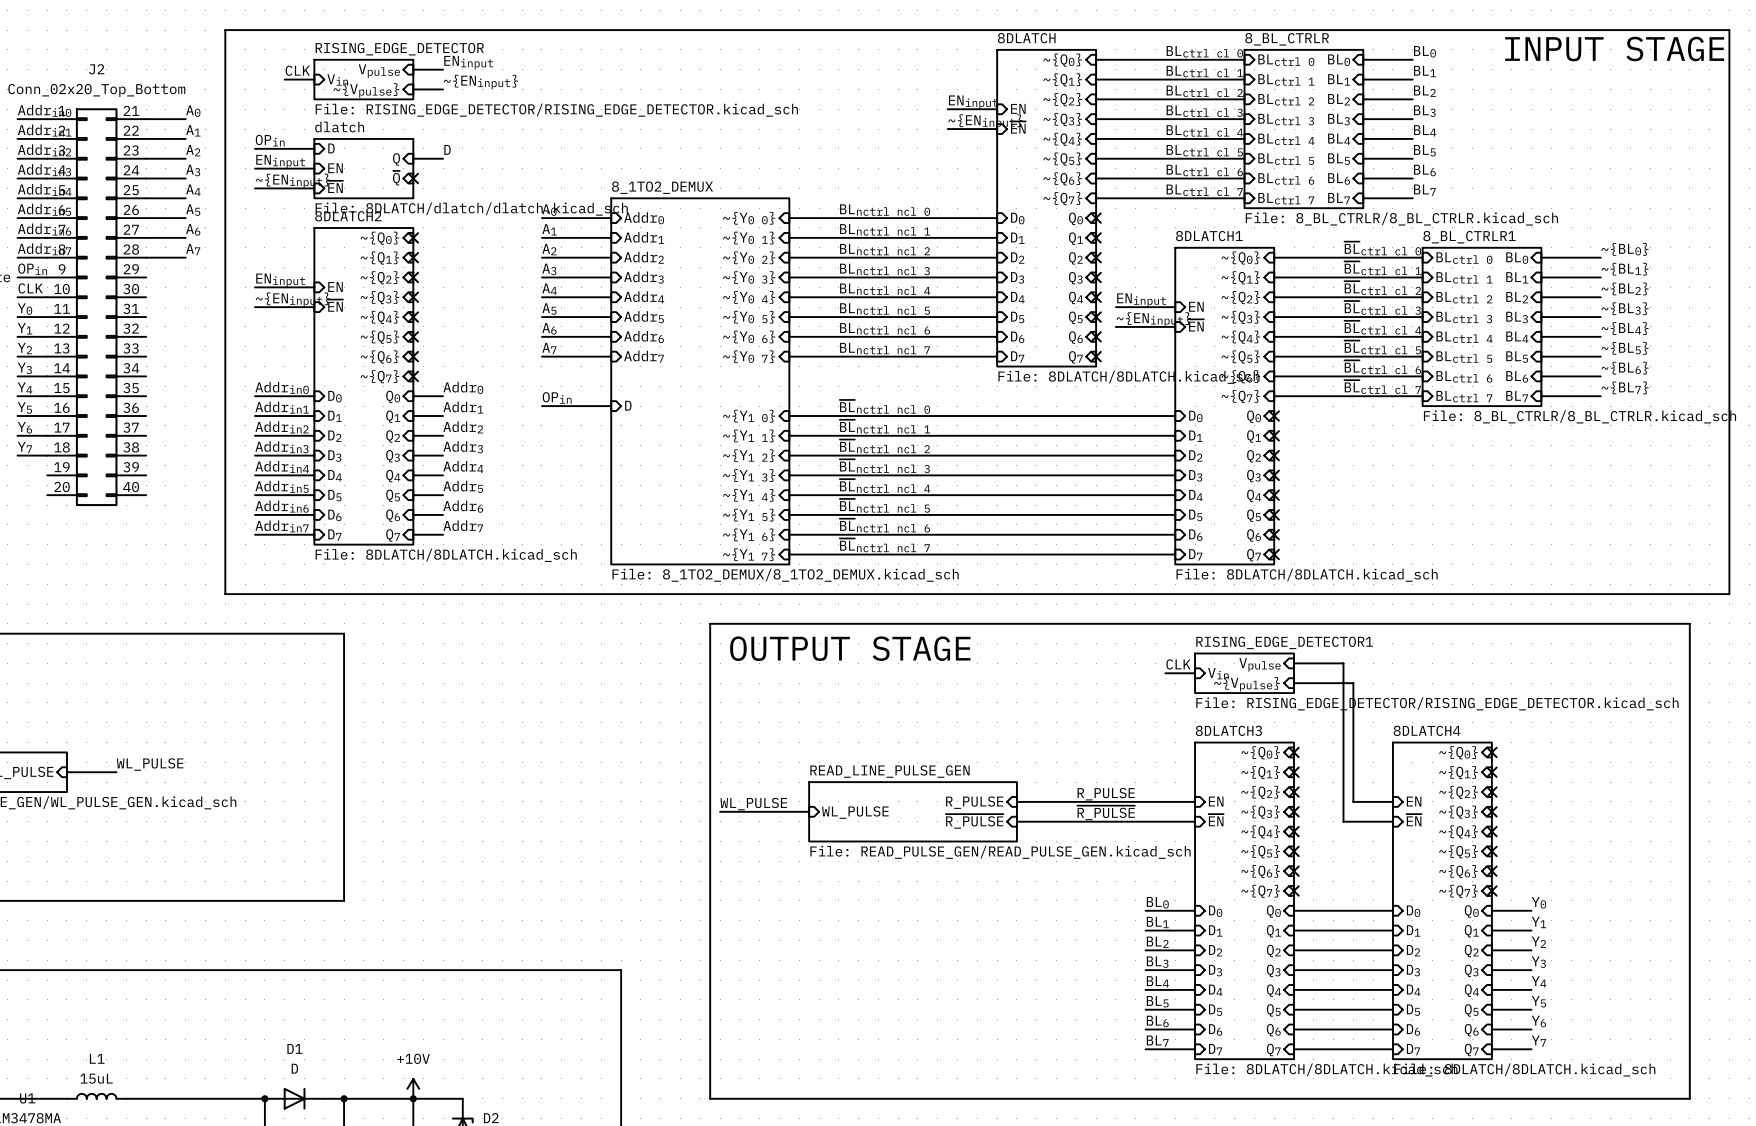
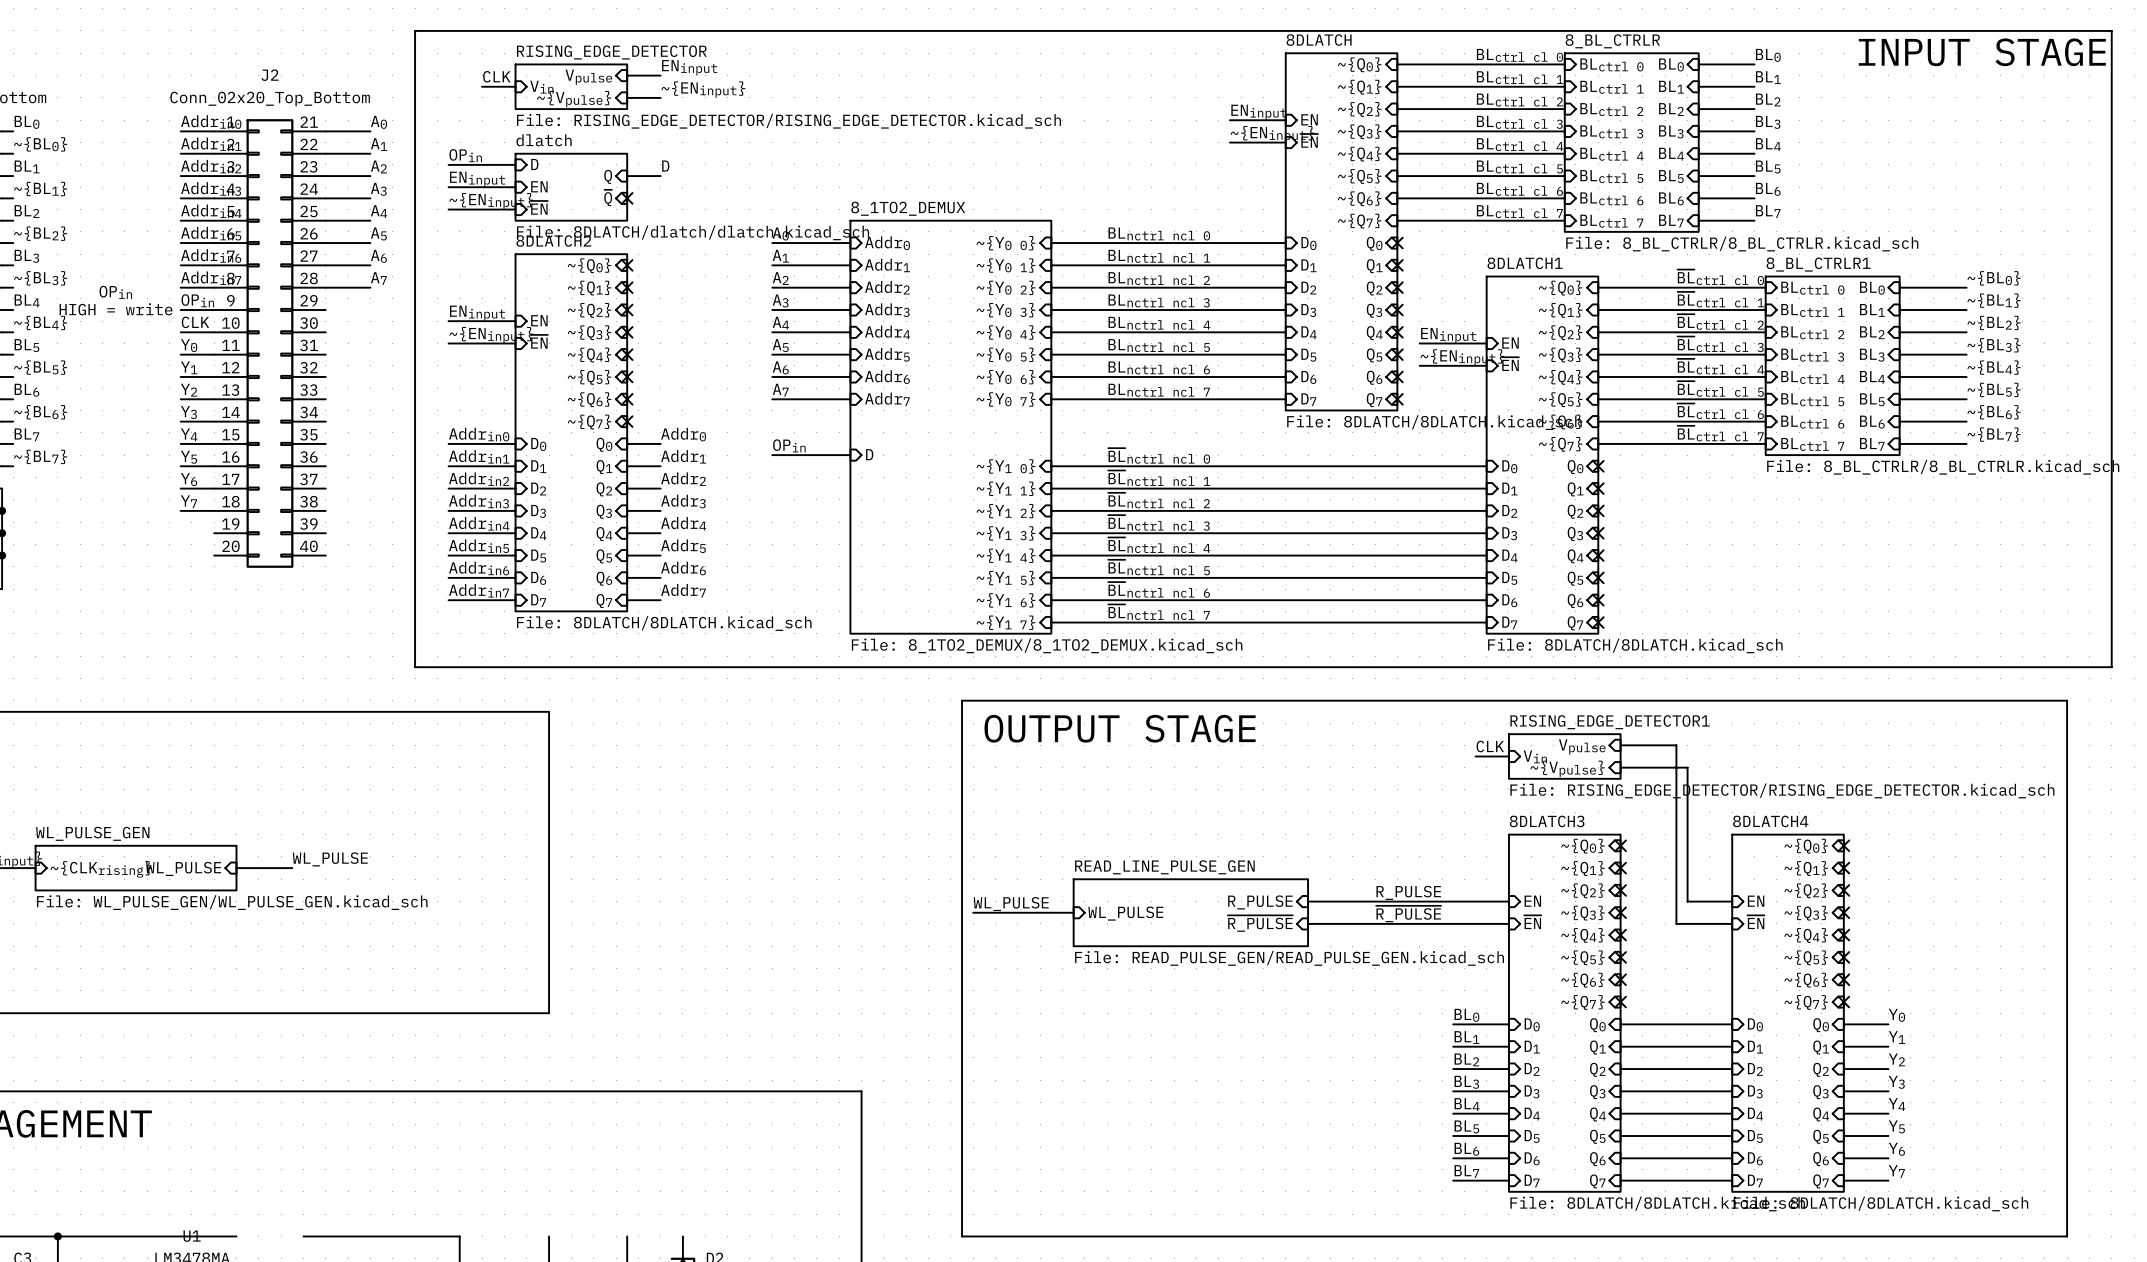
power symbol: +10V (413, 1088) -> none
L1: 15uL (96, 1096) -> none
junction: (264, 1098) -> none
D1: D (294, 1098) -> none
wire: (324, 1098) (462, 1098) -> none
junction: (344, 1098) -> none
junction: (413, 1098) -> none

